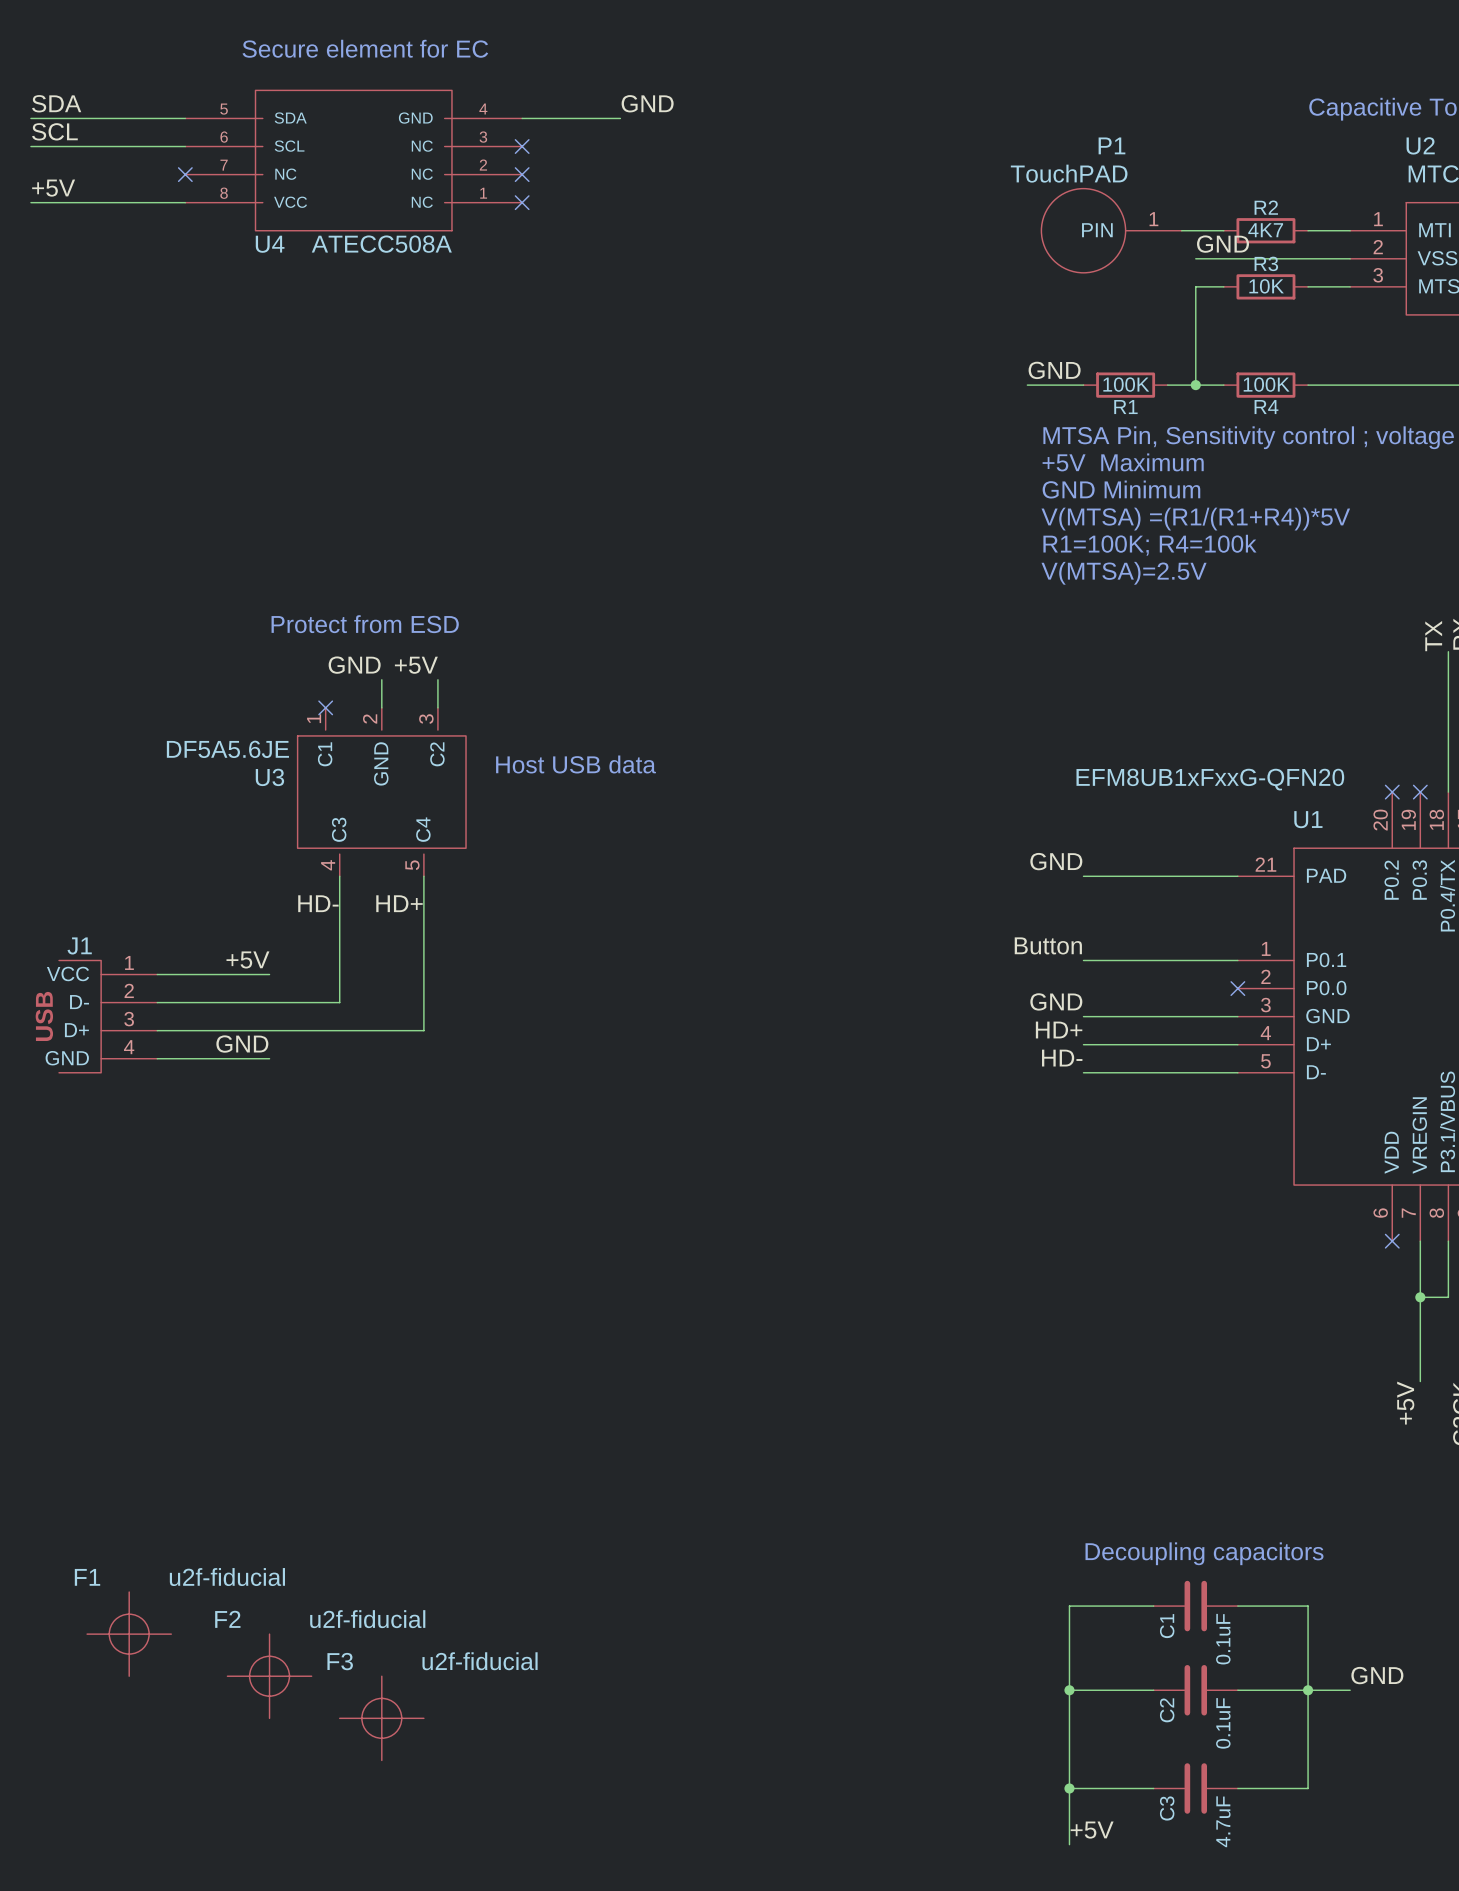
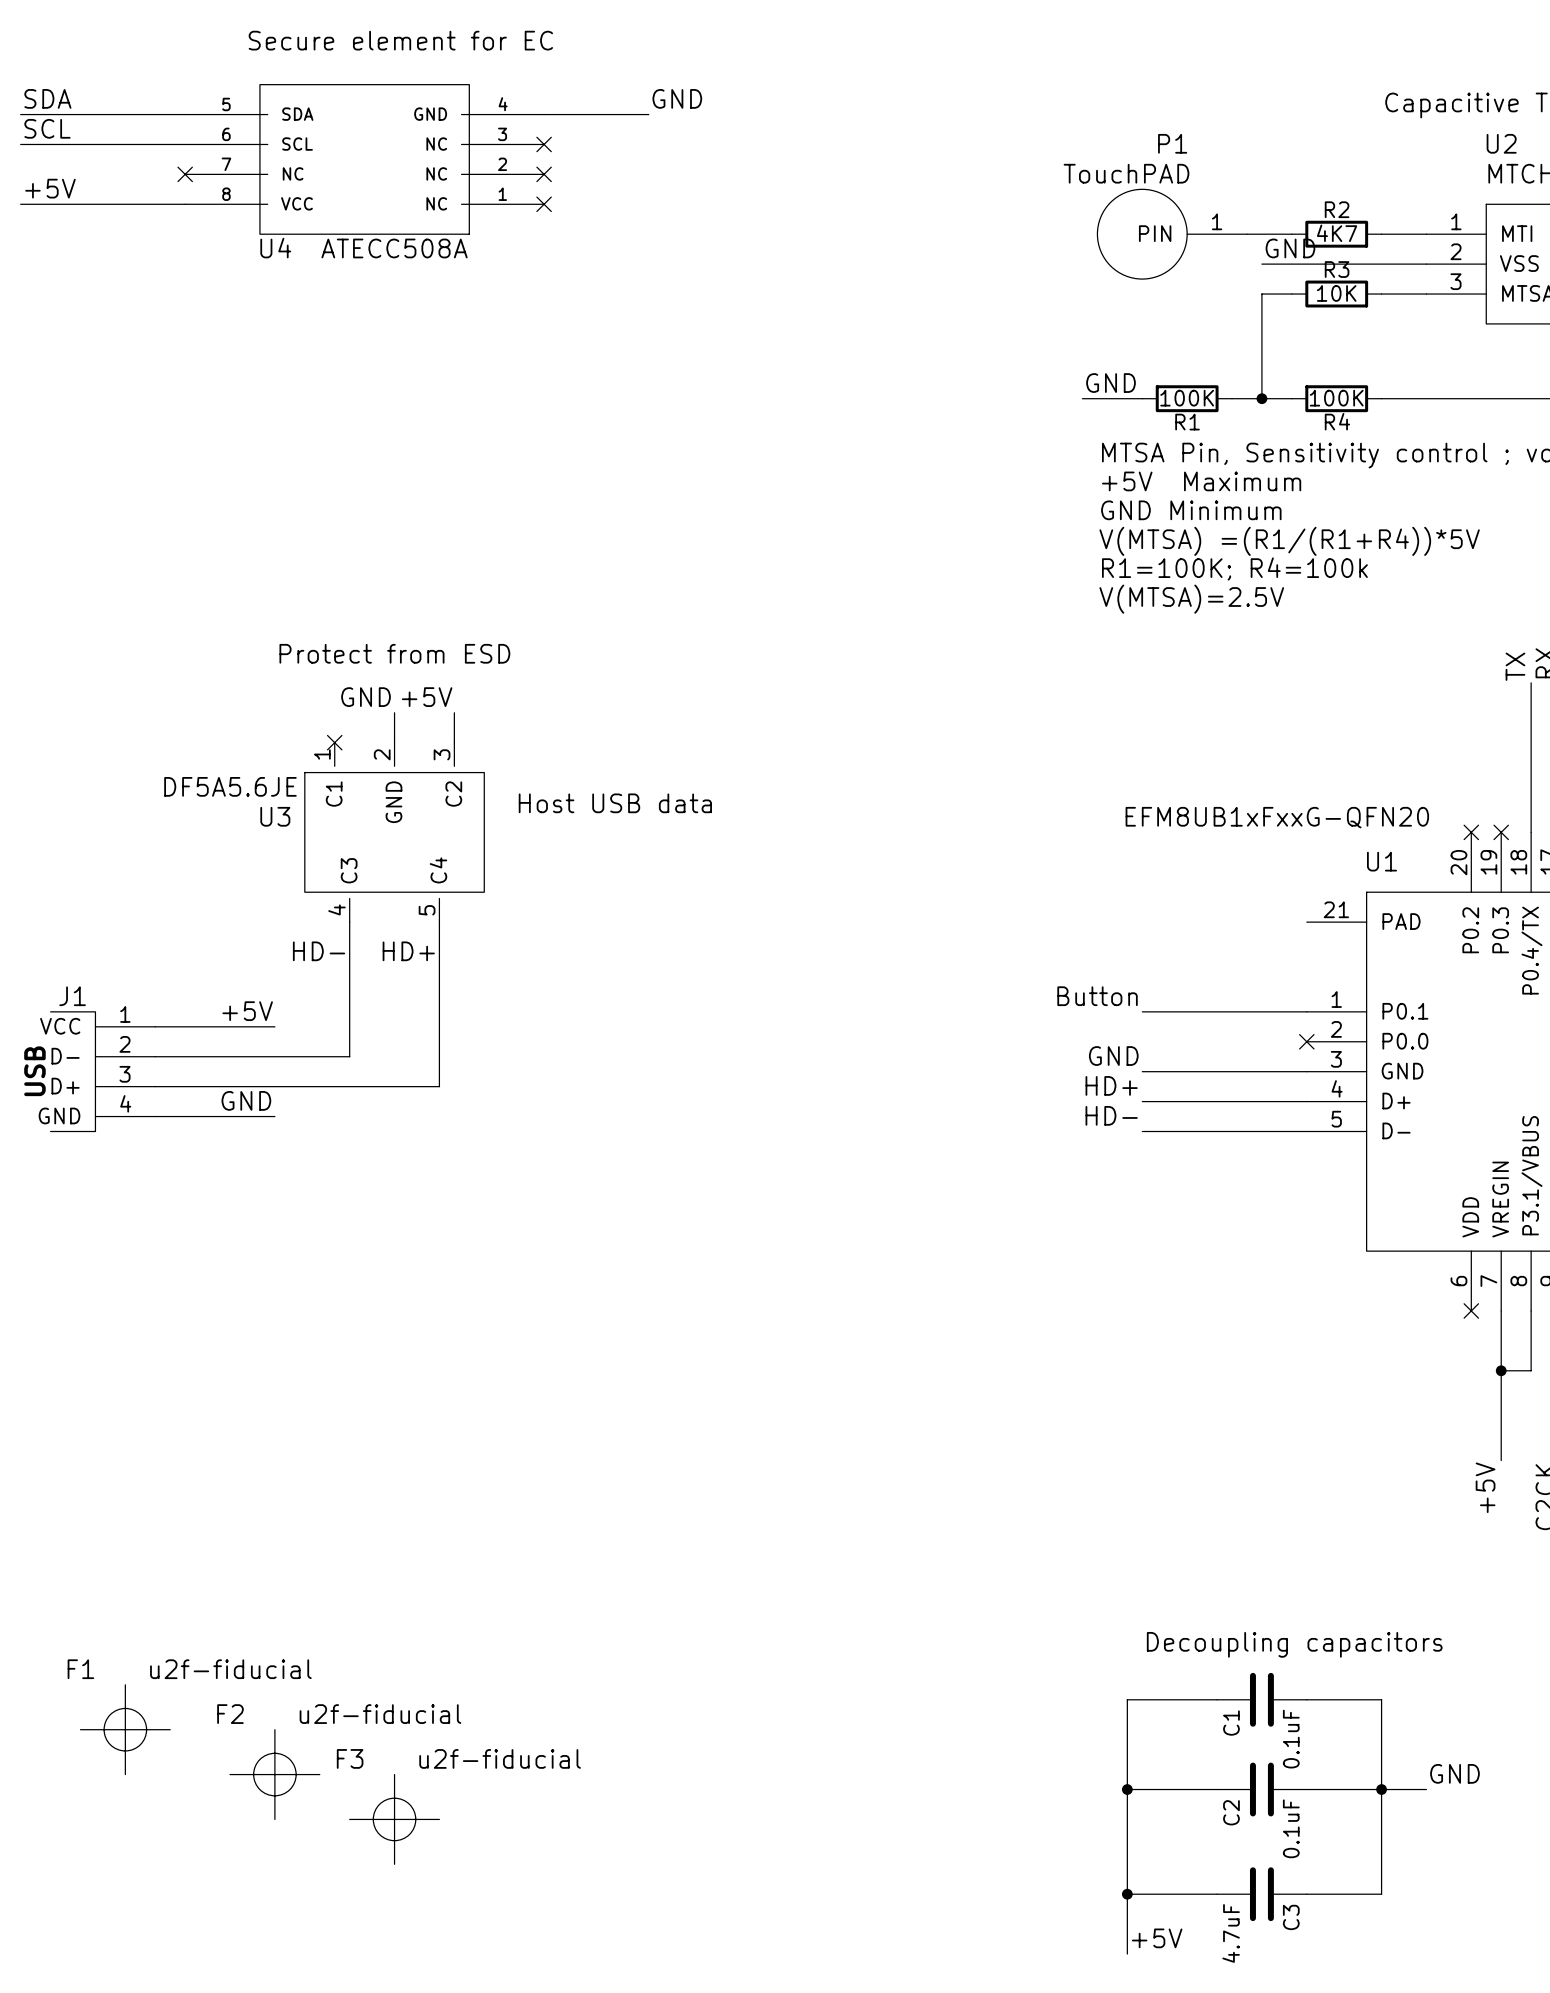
label: GND (1056, 861) -> none
wire: (1083, 876) (1237, 876) -> none
C3 name position: C3 (1167, 1808) -> C3 (1291, 1917)
C3 value position: 4.7uF (1223, 1821) -> 4.7uF (1231, 1933)

